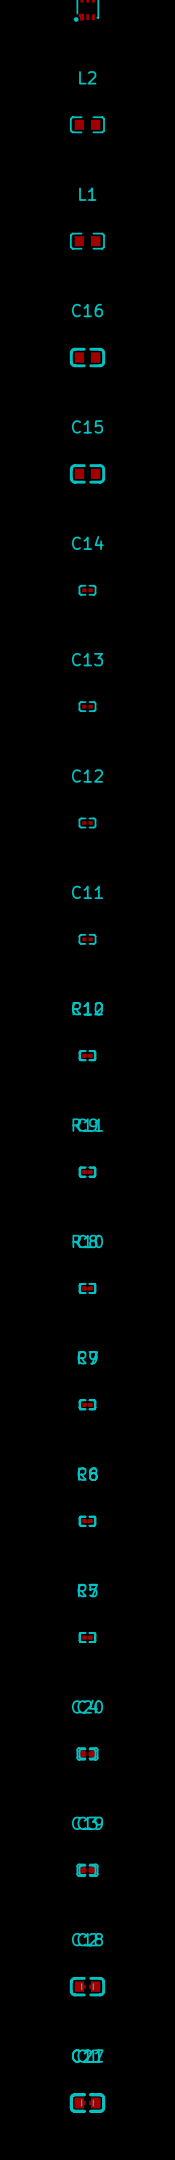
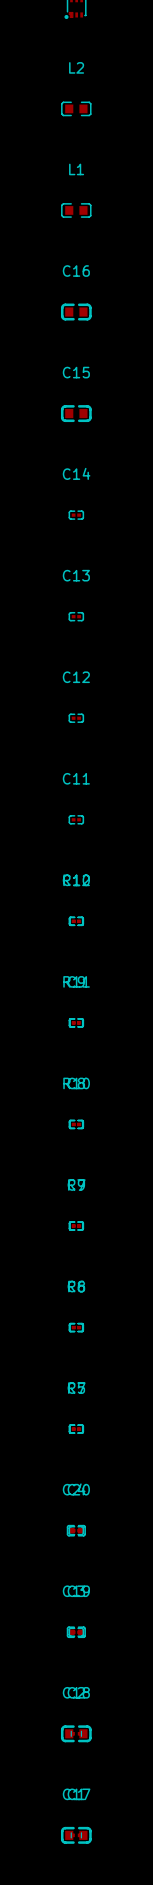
part: (87, 2103) -> none

